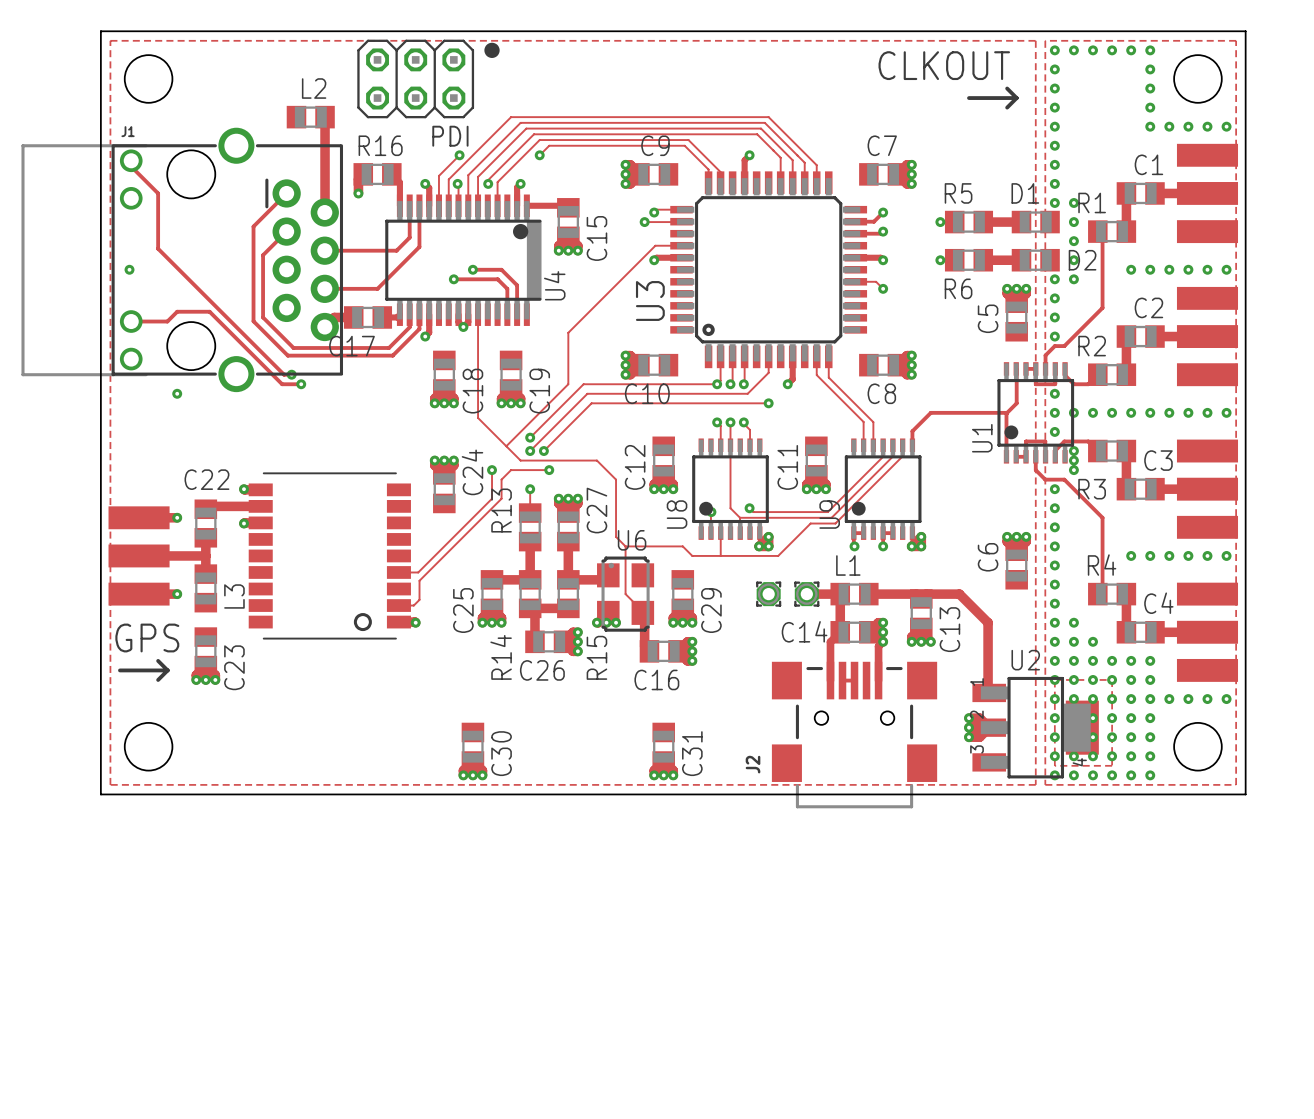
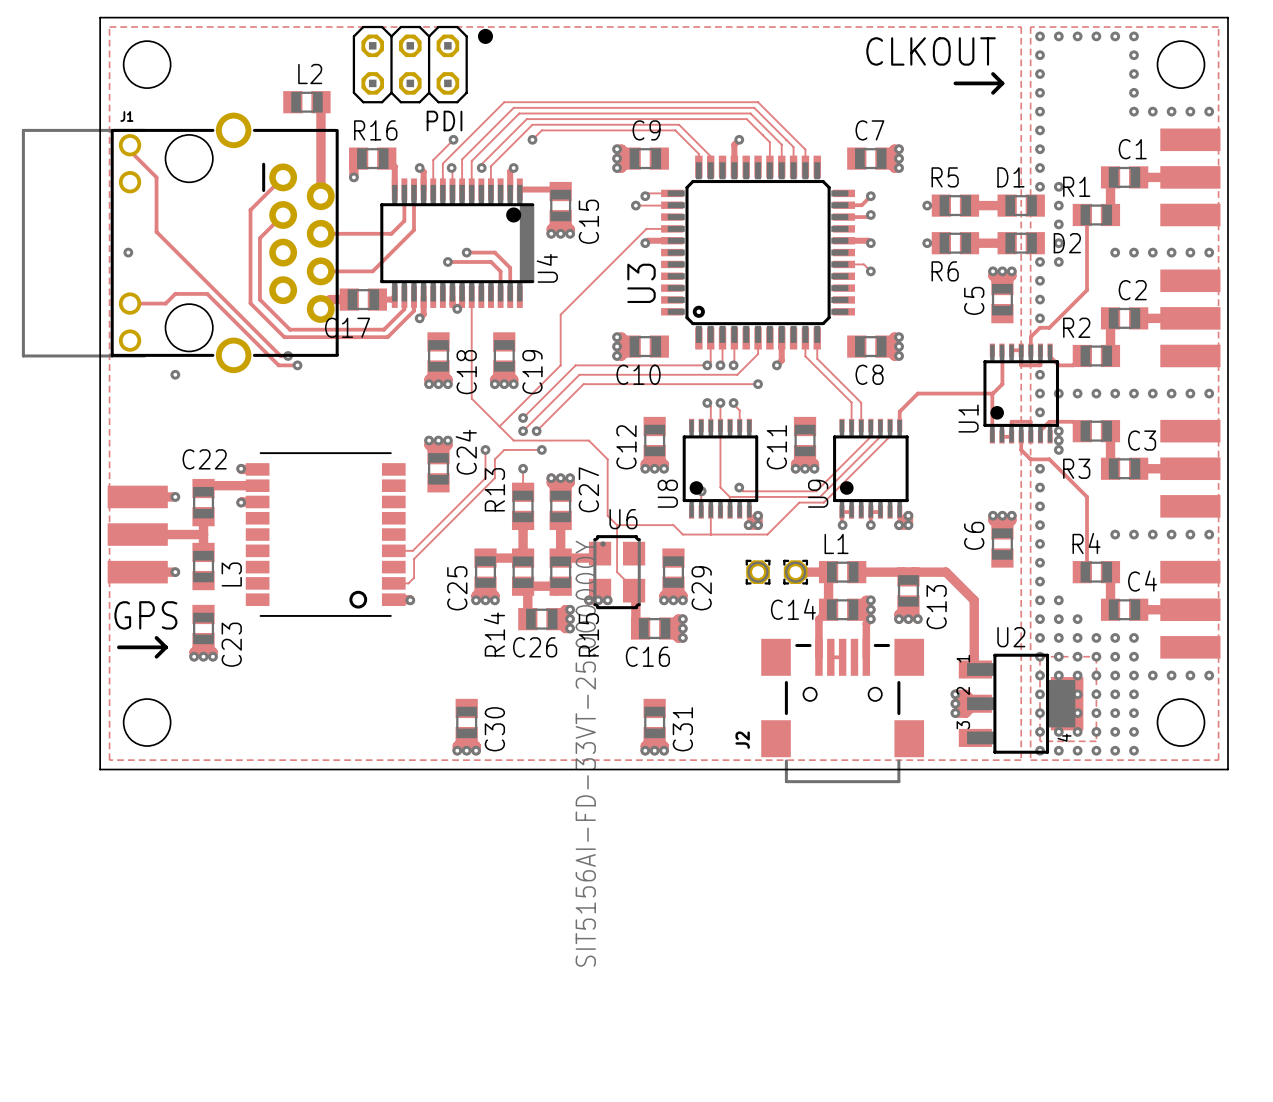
U6 value: none -> SIT5156AI-FD-33VT-25.000000Y (585, 753)

